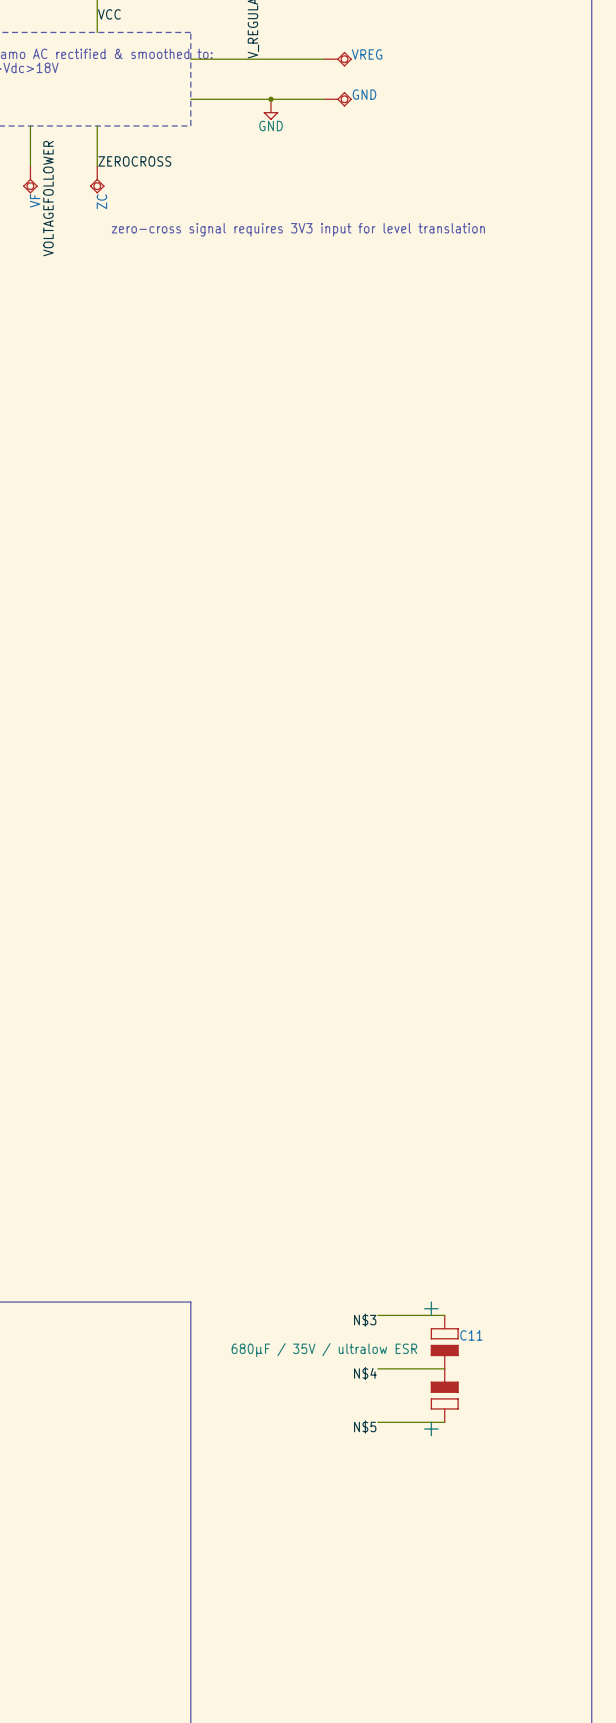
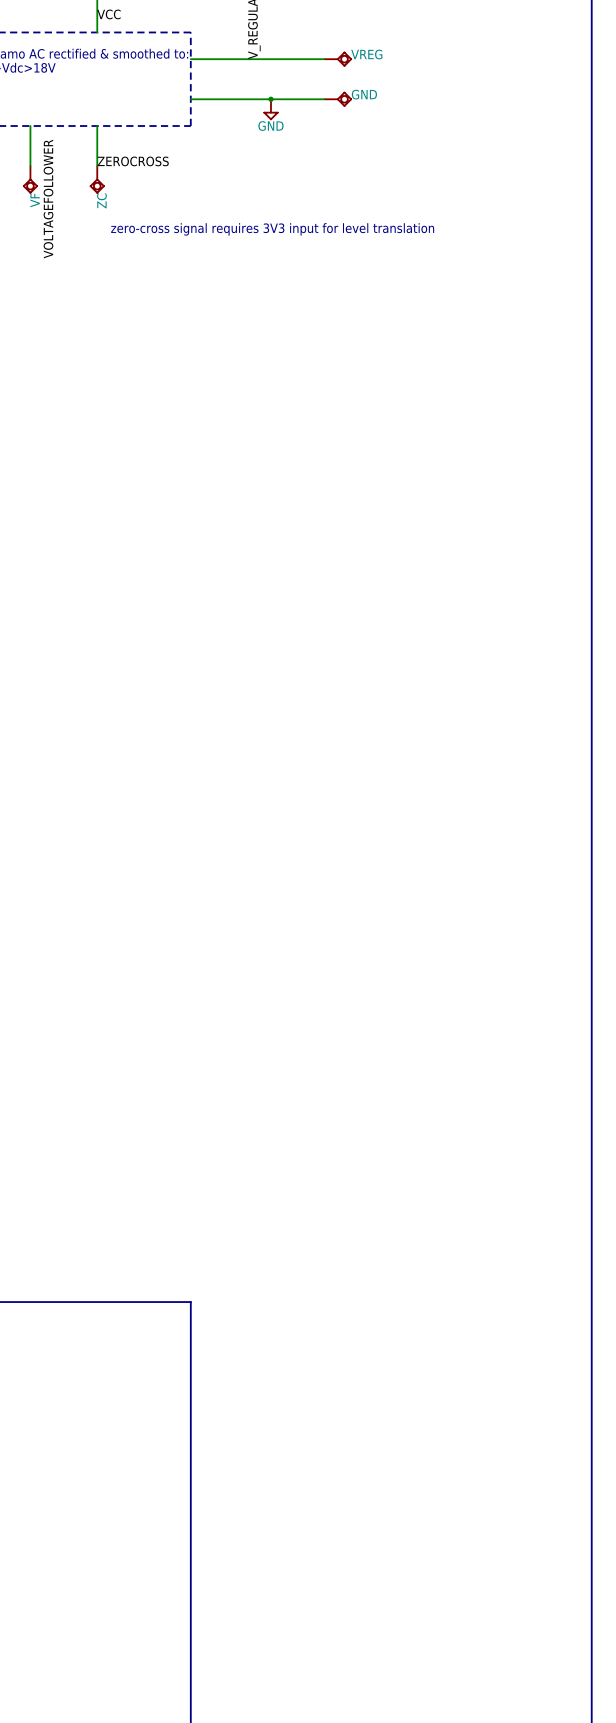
wire: (377, 1315) (444, 1315) -> none
label: N$3 (365, 1320) -> none
wire: (377, 1368) (444, 1368) -> none
C11: 680μF / 35V / ultralow ESR (441, 1368) -> none
label: N$4 (365, 1373) -> none
wire: (377, 1422) (444, 1422) -> none
label: N$5 (365, 1426) -> none

